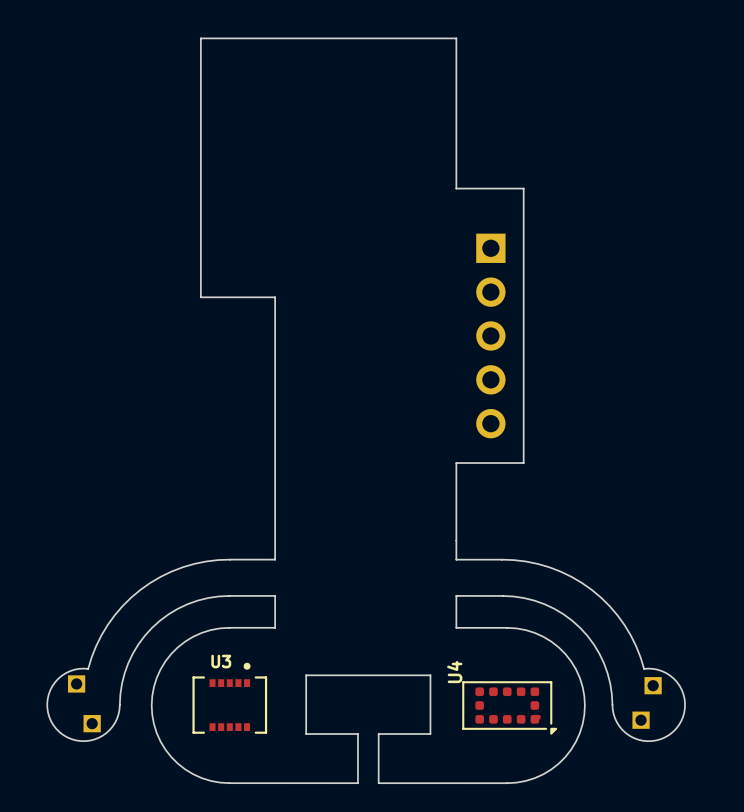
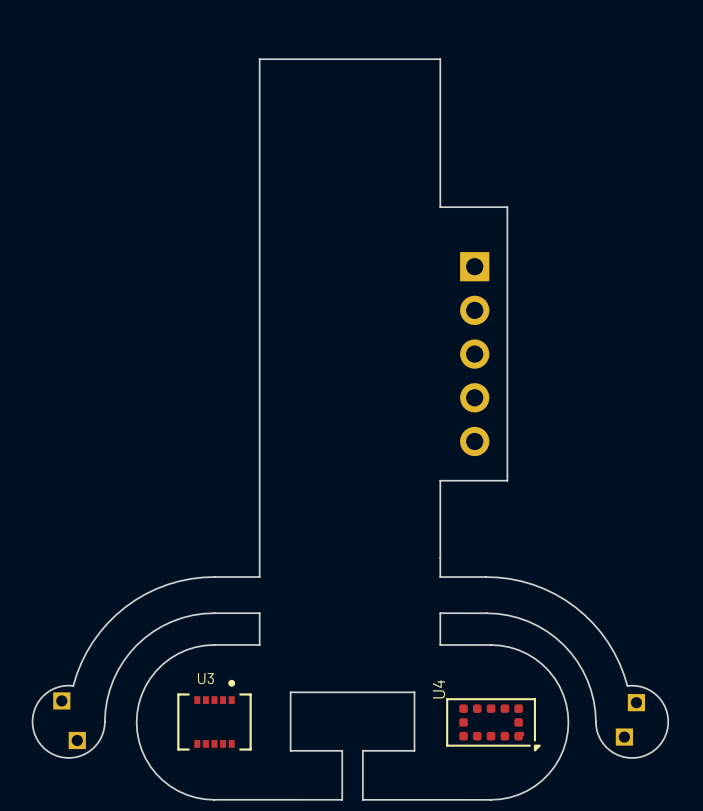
board edge: (456, 40) (456, 38) (200, 38) (200, 297) (275, 297) -> (440, 59) (259, 59) (259, 315)

